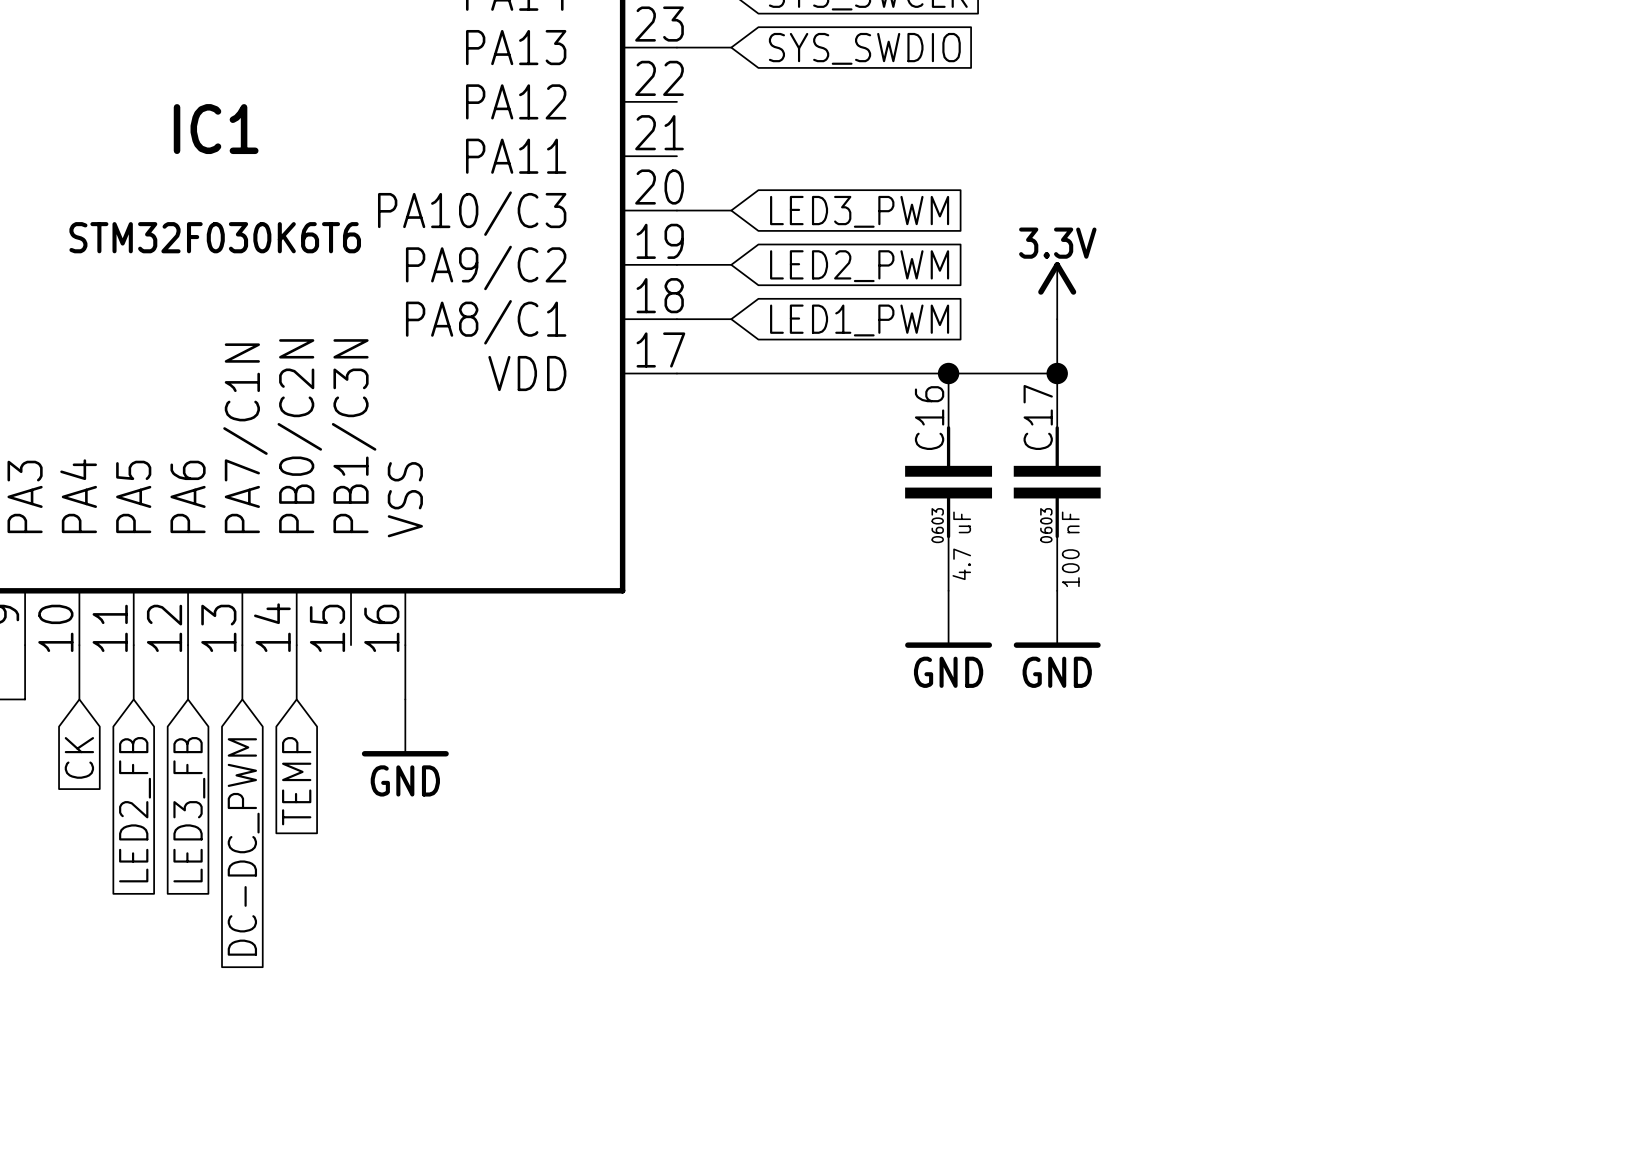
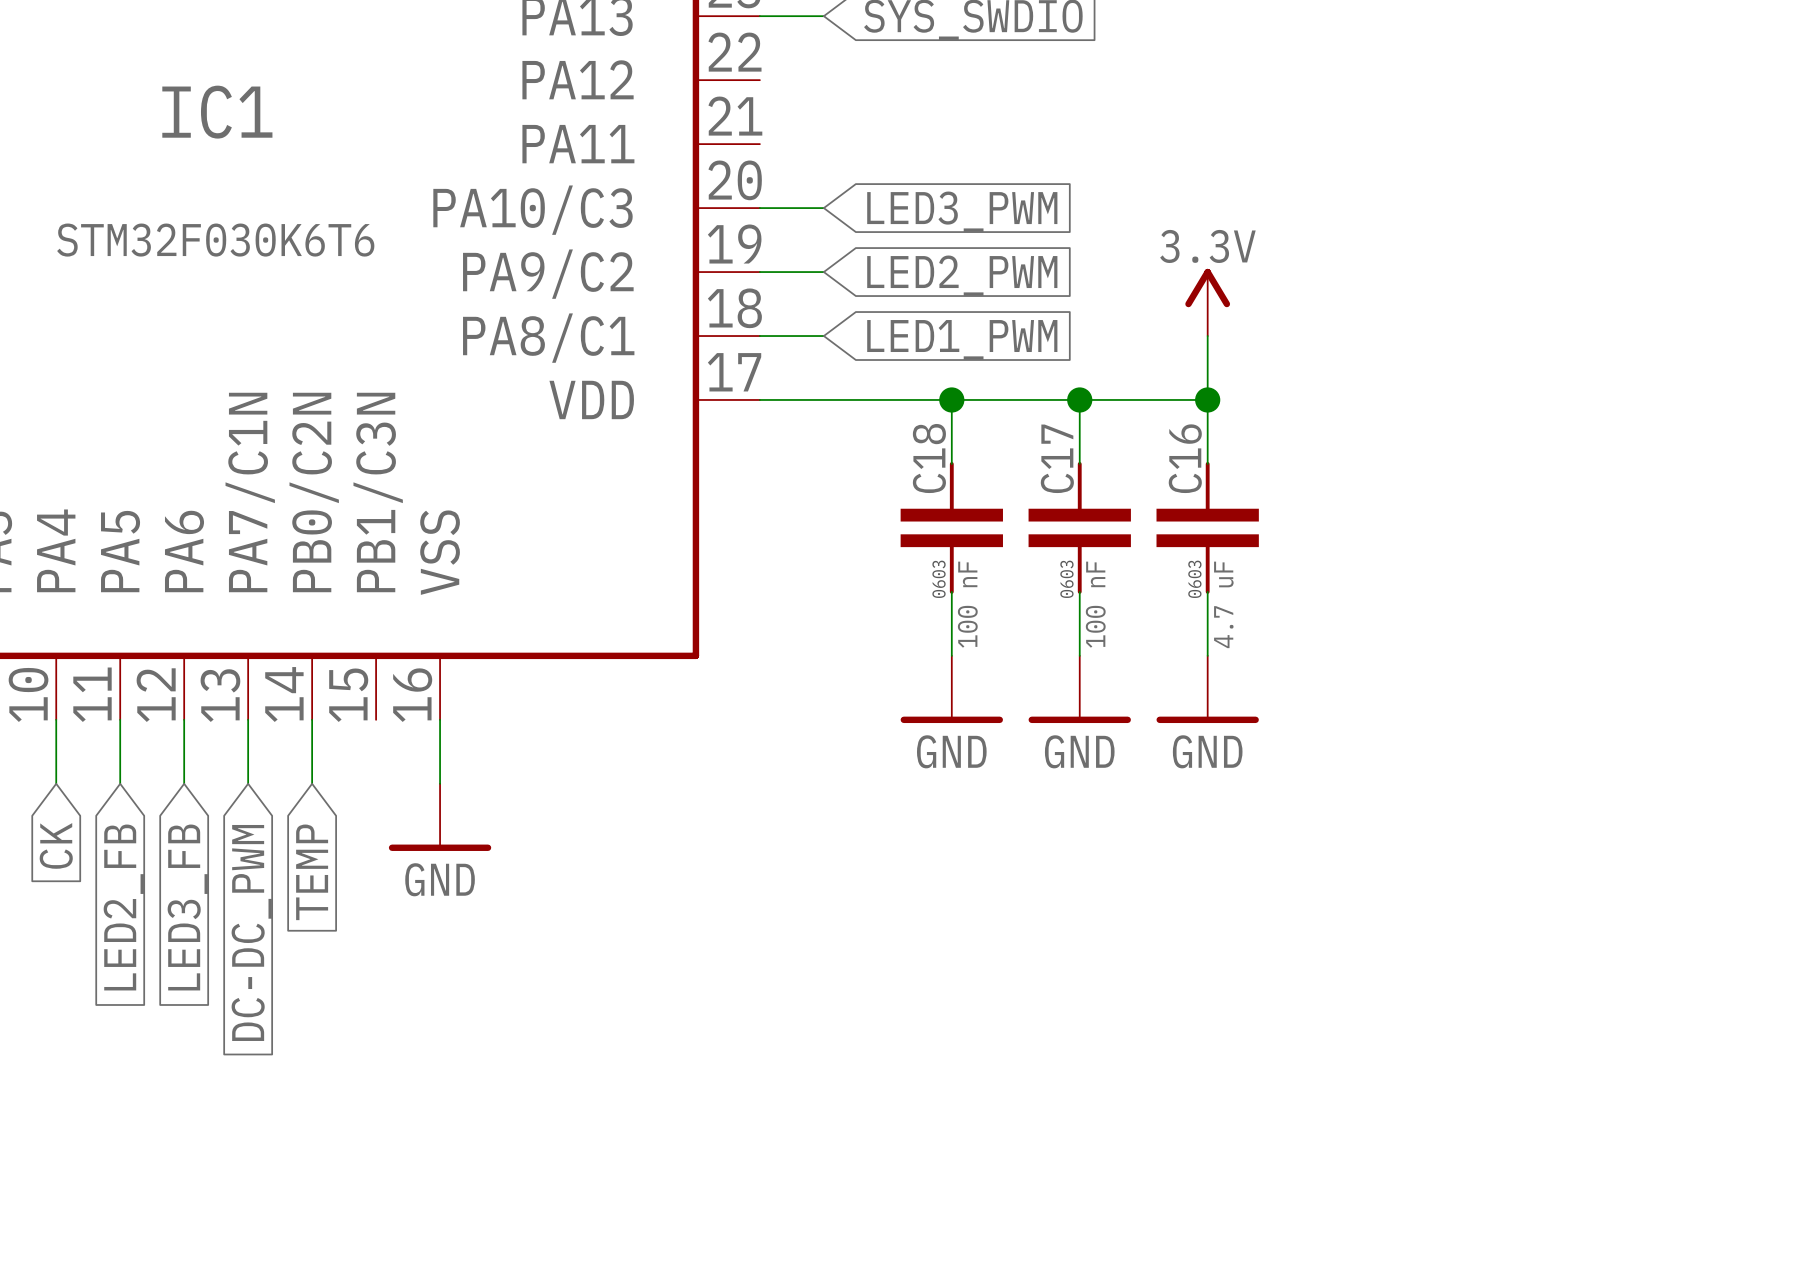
wire: none -> (951, 399) (951, 463)
junction: none -> (951, 399)
C17 name: C17 (1038, 417) -> C16 (1185, 458)
C16 name: C16 (929, 418) -> C17 (1057, 458)
C18: none -> 100 nF (951, 527)
wire: none -> (951, 591) (951, 655)
C16 value: 4.7 uF (961, 545) -> 100 nF (1095, 604)
C17 value: 100 nF (1070, 549) -> 4.7 uF (1223, 604)
power symbol: none -> GND (951, 689)

